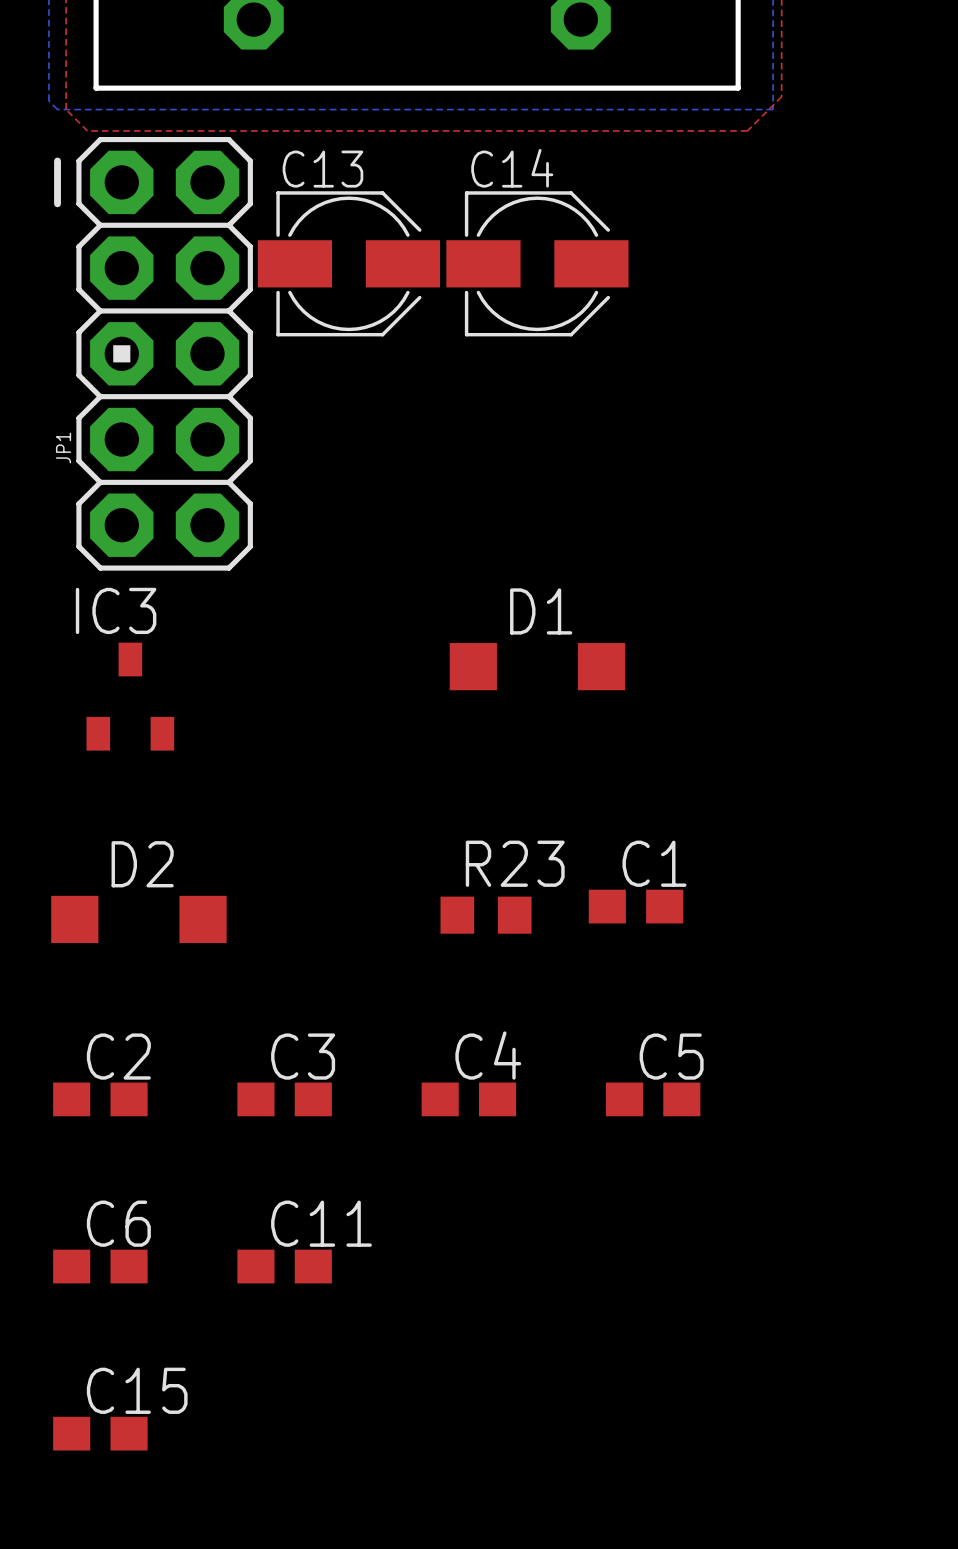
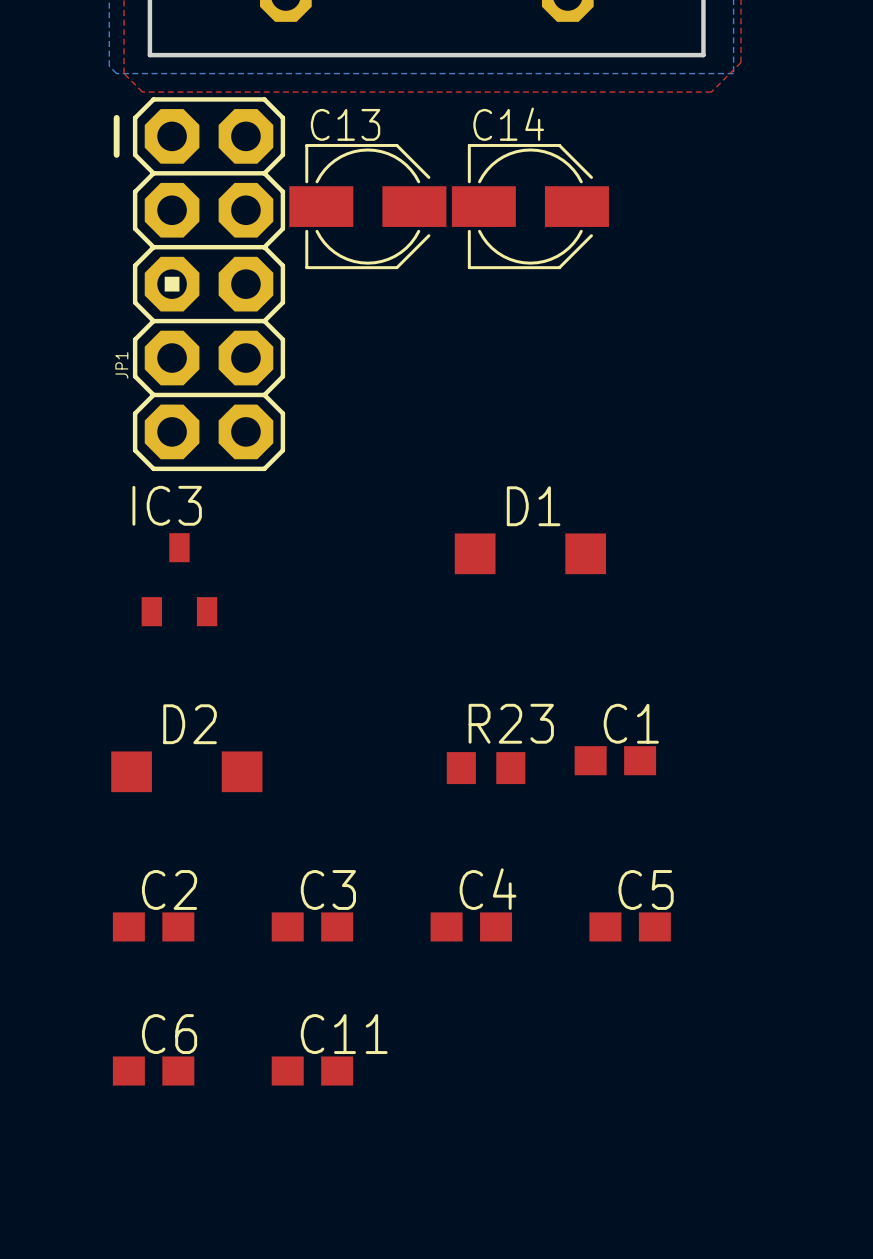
C15: (100, 1433) -> none

